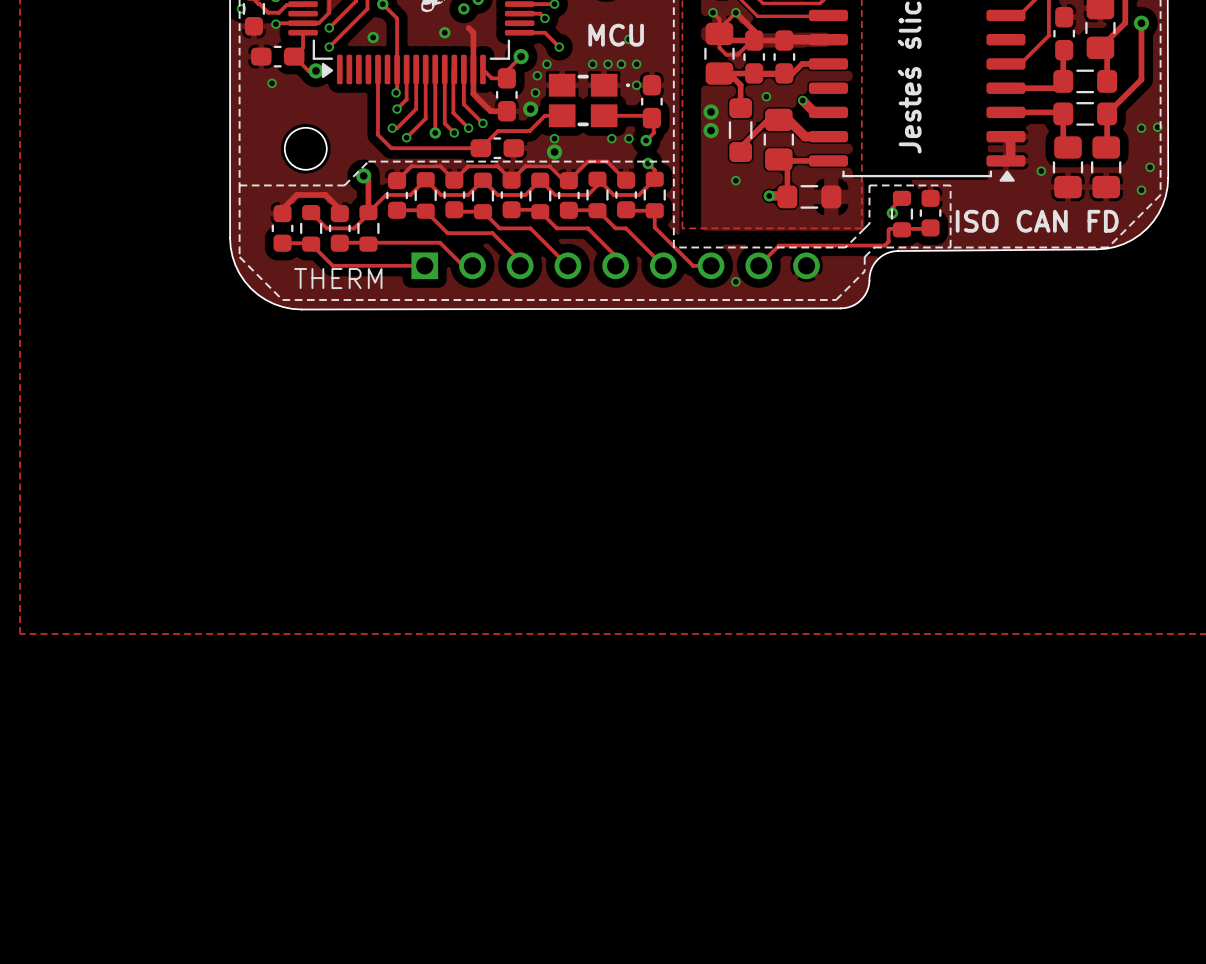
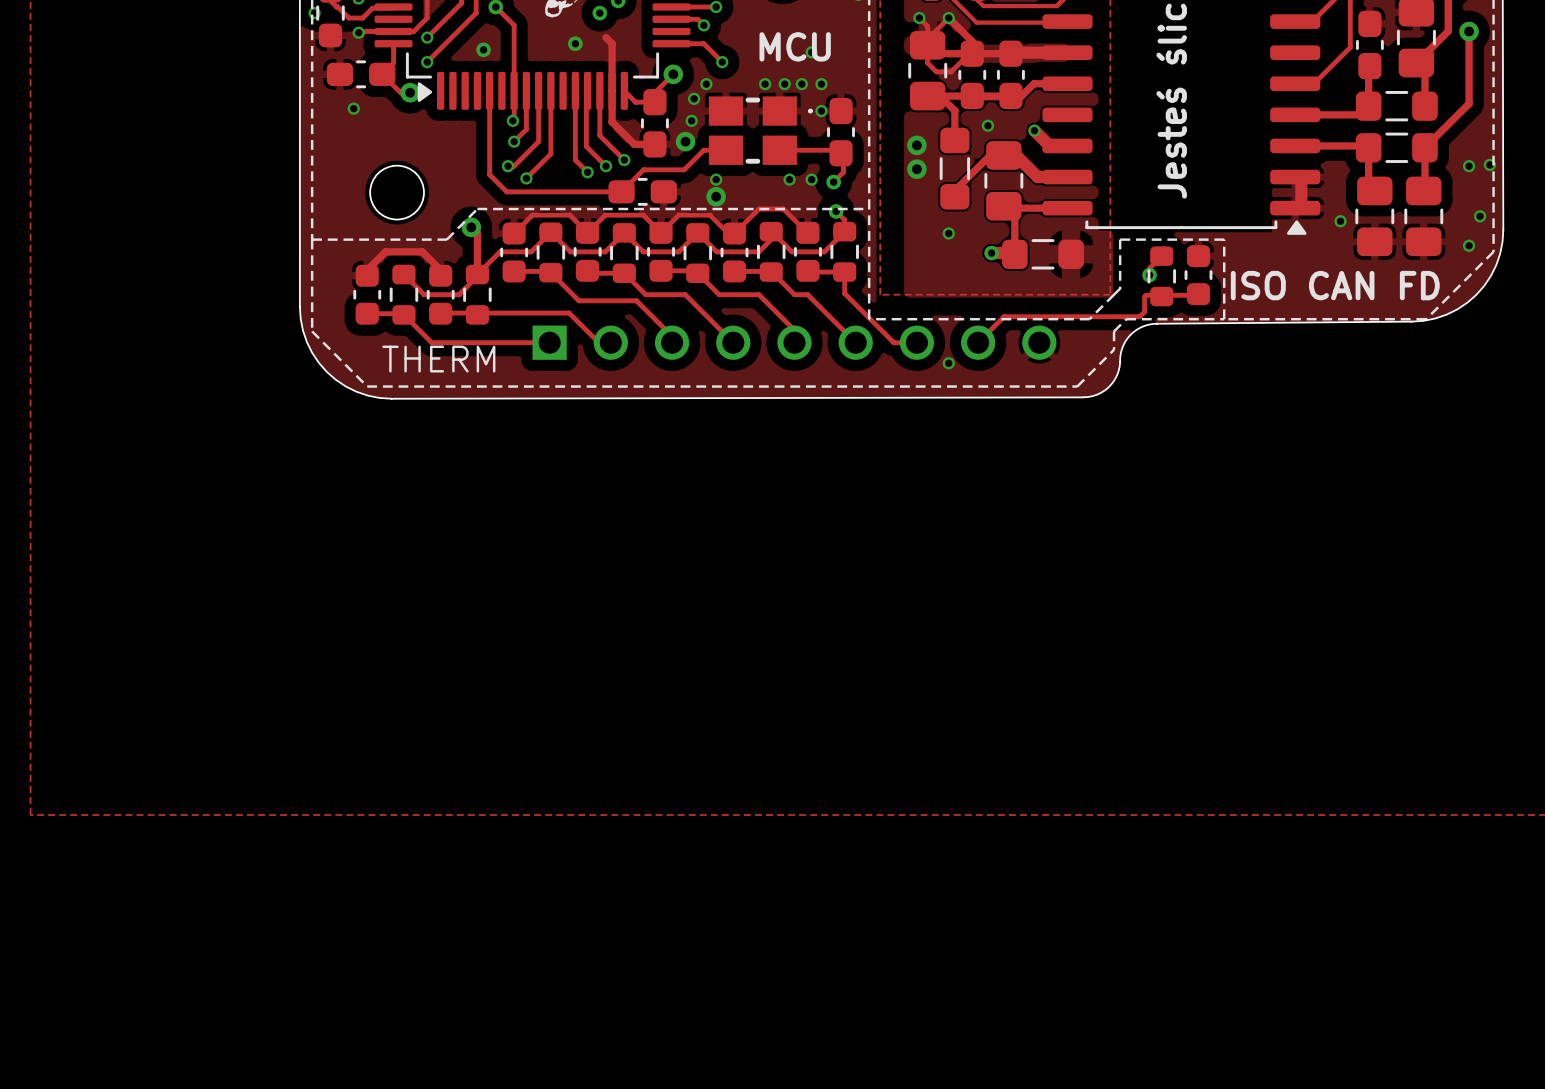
track: (435, 69) (435, 132) -> none
via: (435, 132) -> none

